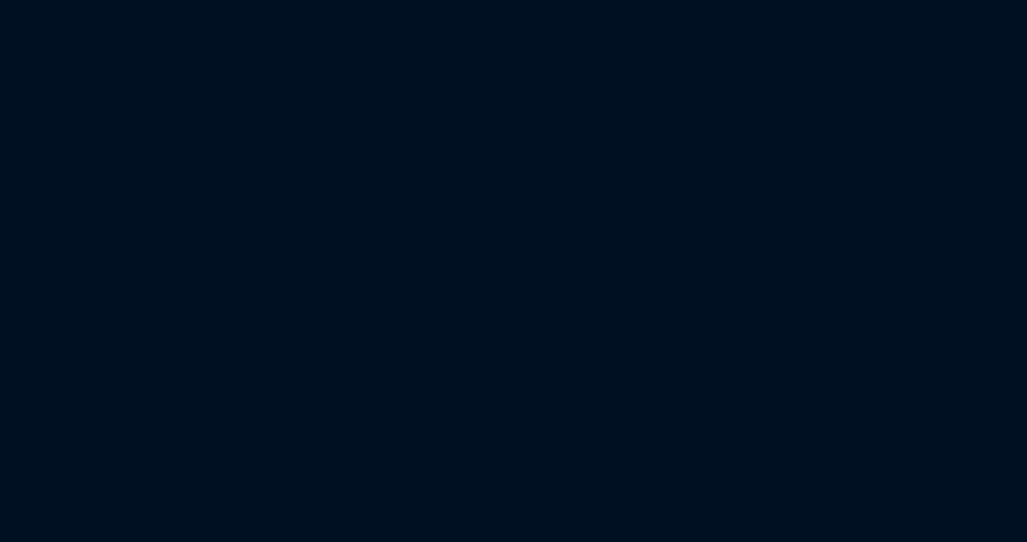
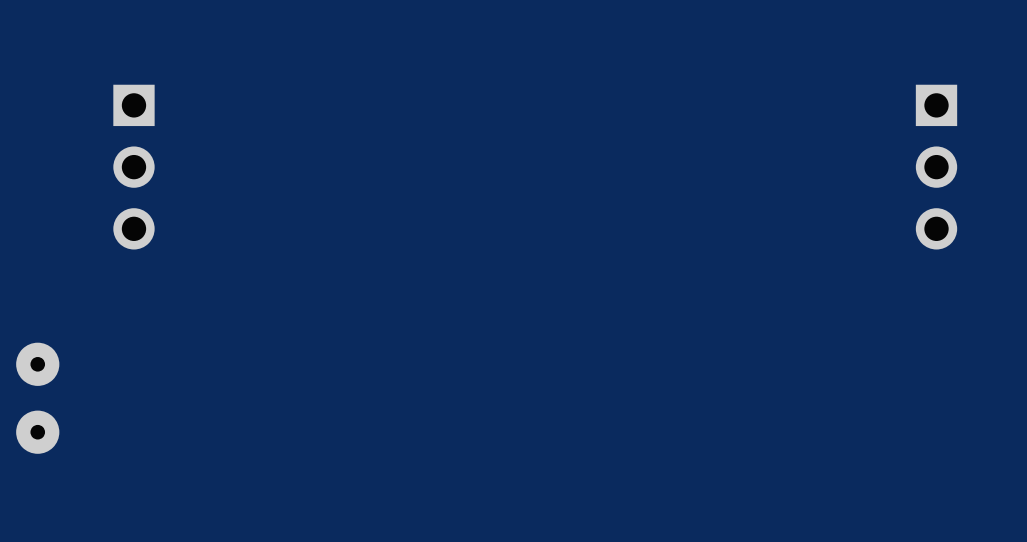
part: none -> (133, 167)
part: none -> (936, 167)
part: none -> (37, 398)

